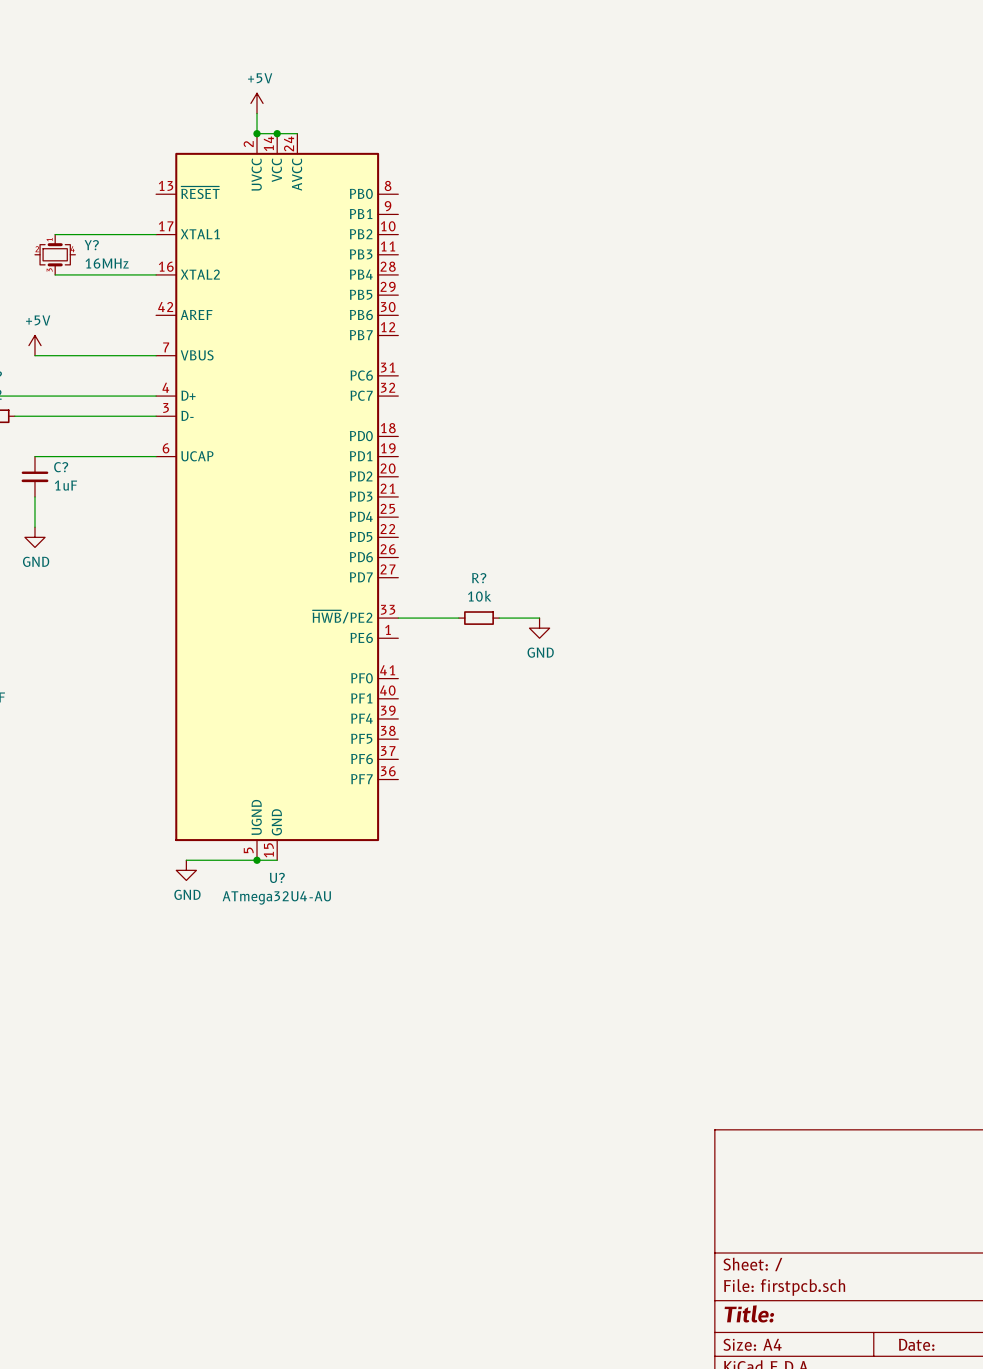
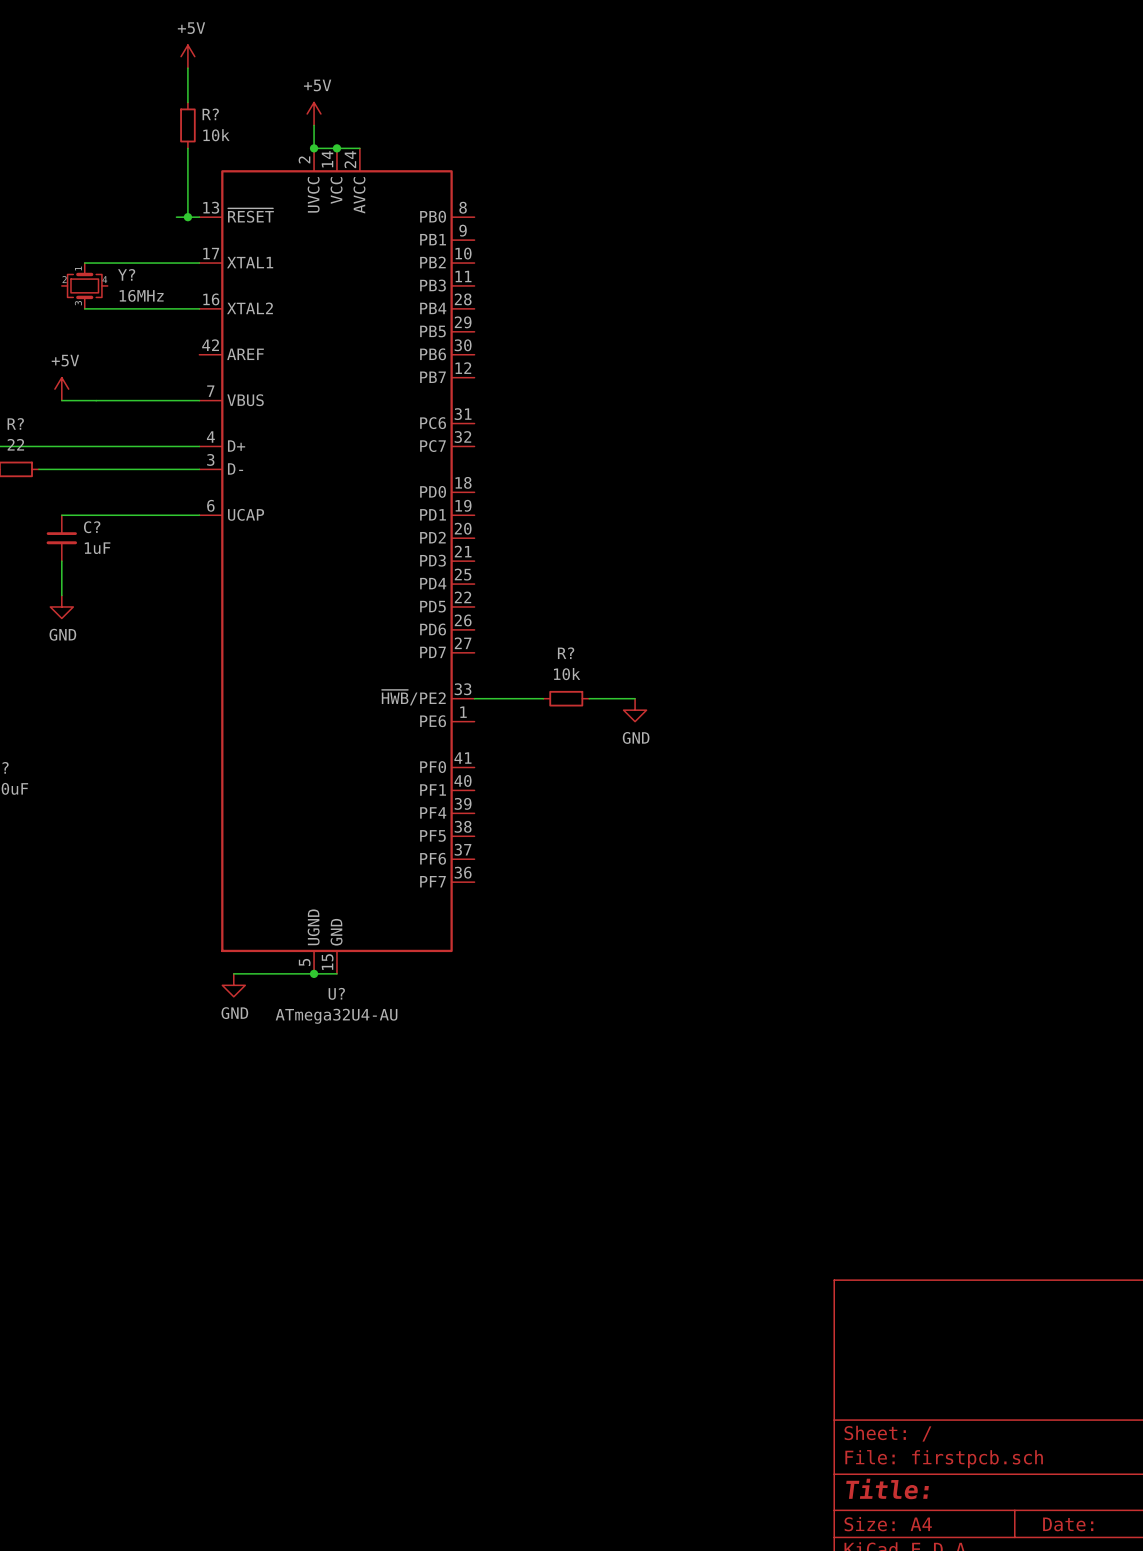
power symbol: none -> +5V (187, 56)
wire: none -> (187, 68) (187, 102)
R?: none -> 10k (187, 125)
wire: none -> (187, 148) (187, 217)
wire: none -> (176, 217) (199, 217)
junction: none -> (187, 217)

